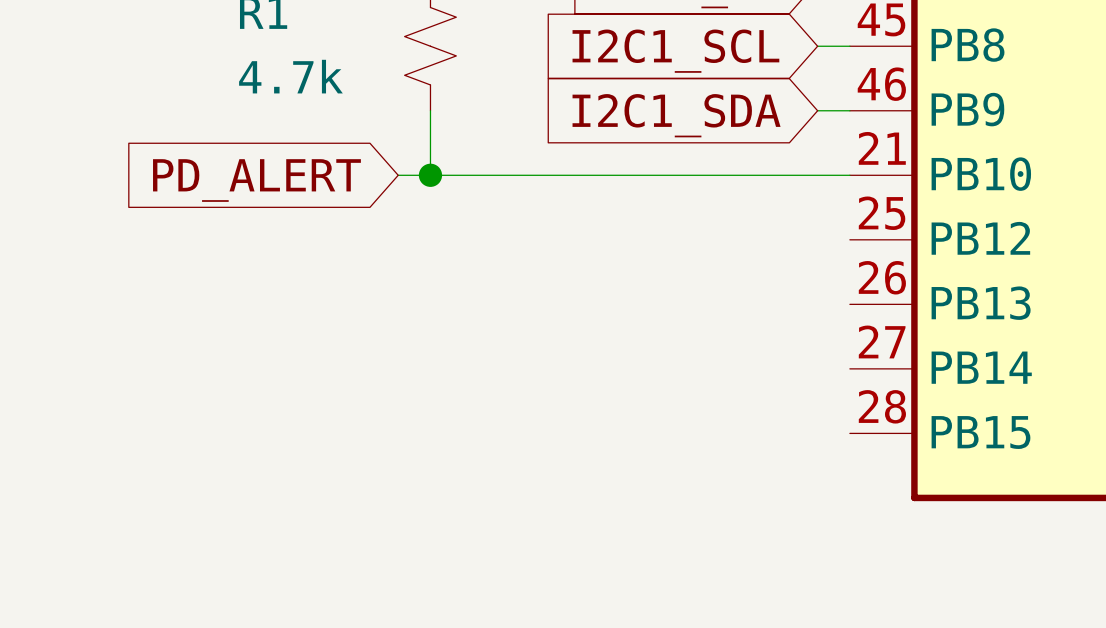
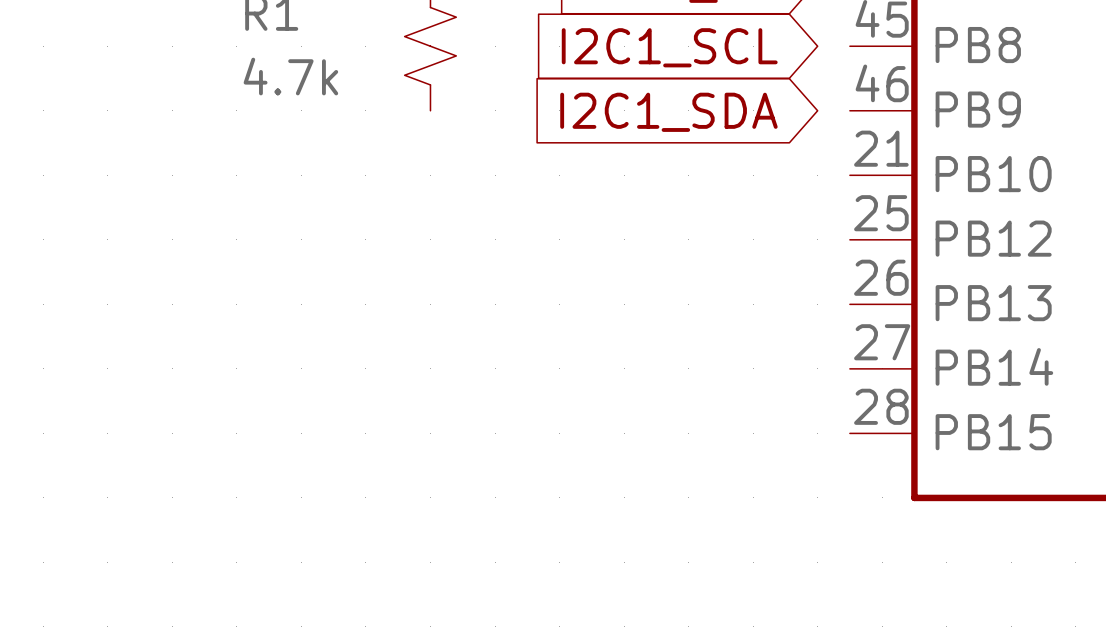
wire: (817, 46) (849, 46) -> none
wire: (430, 110) (430, 175) -> none
wire: (817, 110) (849, 110) -> none
wire: (398, 175) (849, 175) -> none
junction: (430, 175) -> none
global label: PD_ALERT (256, 180) -> none

